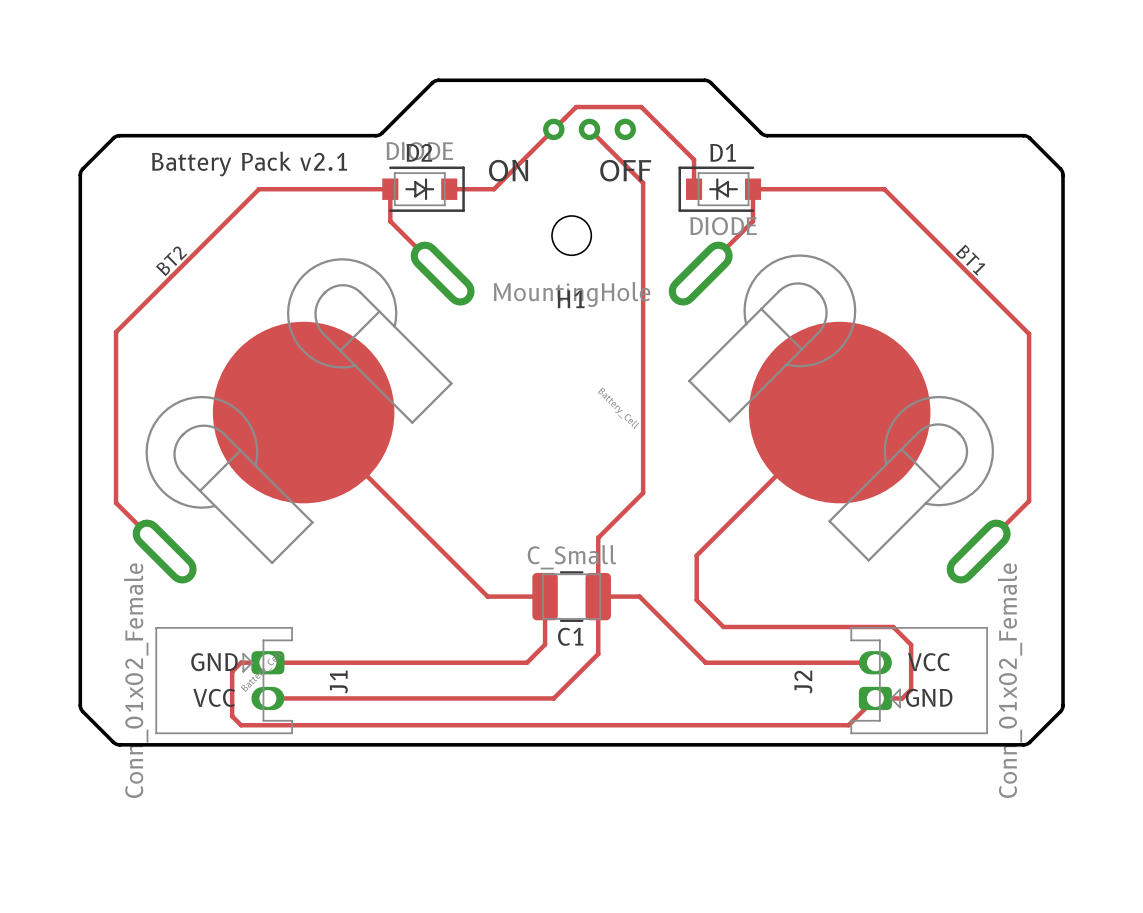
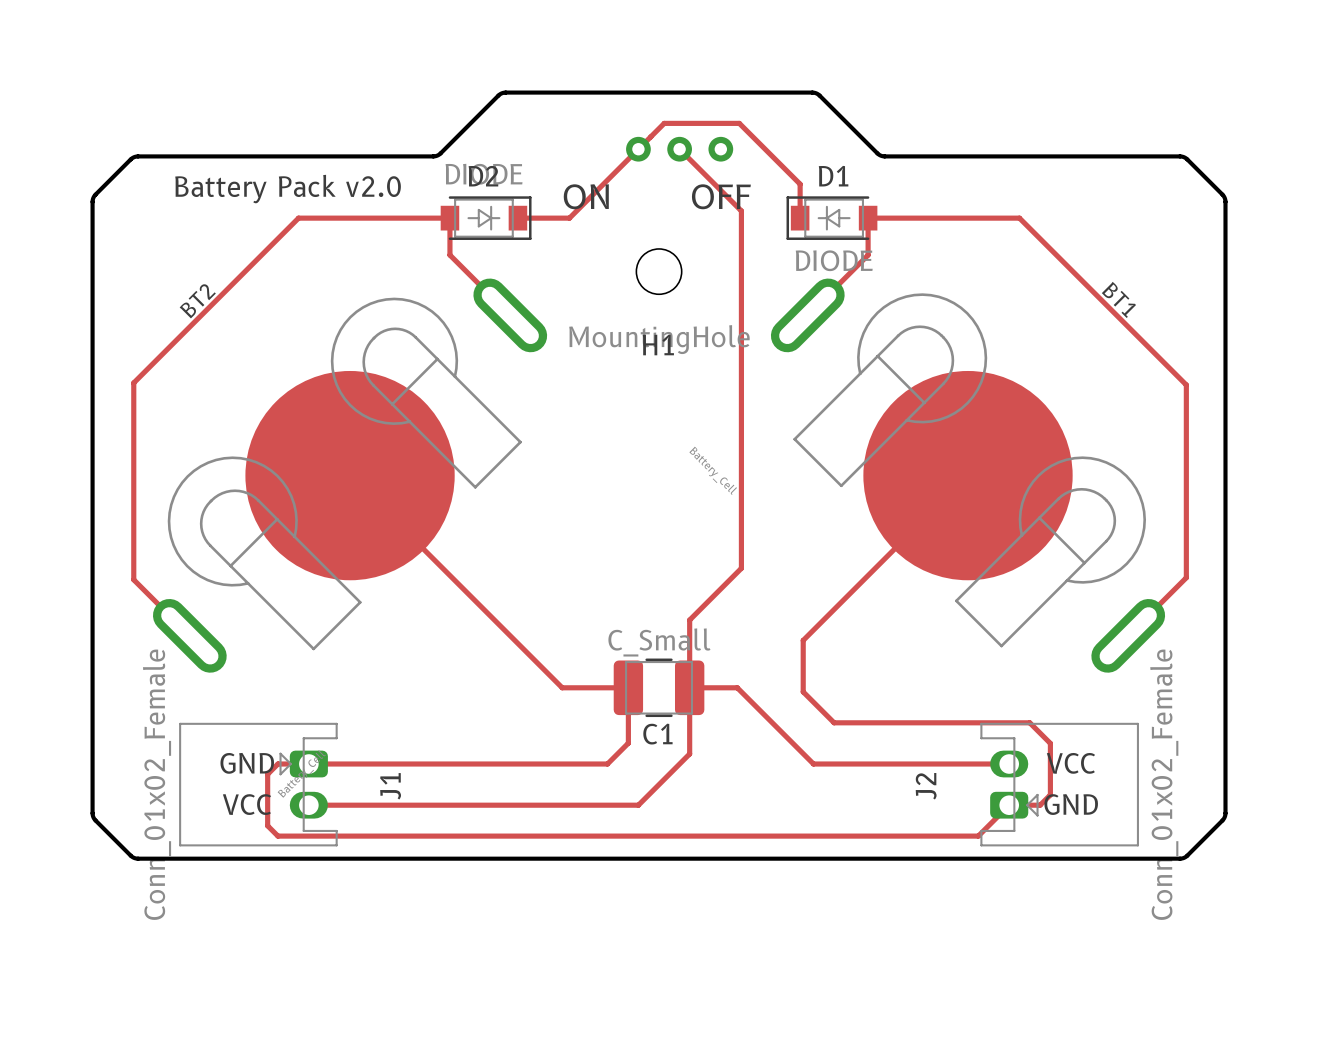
text: Battery Pack v2.1 (249, 163) -> Battery Pack v2.0 (288, 189)
D2 footprint: [382, 166, 465, 212] -> [440, 196, 532, 240]
D1 footprint: [678, 166, 762, 212] -> [786, 196, 878, 240]

